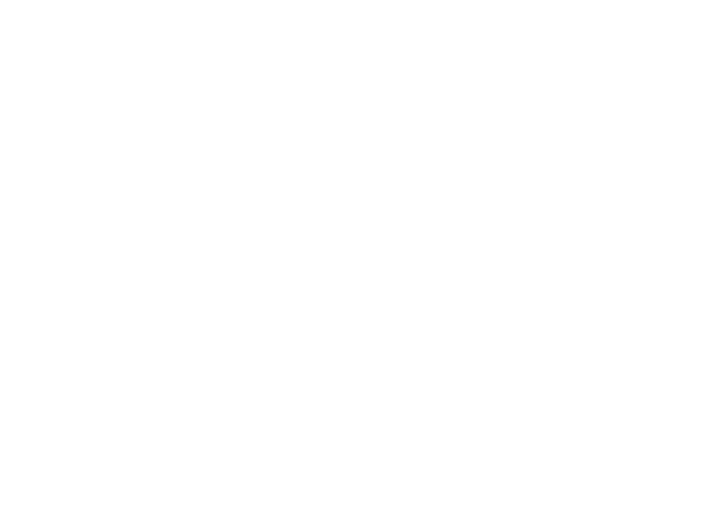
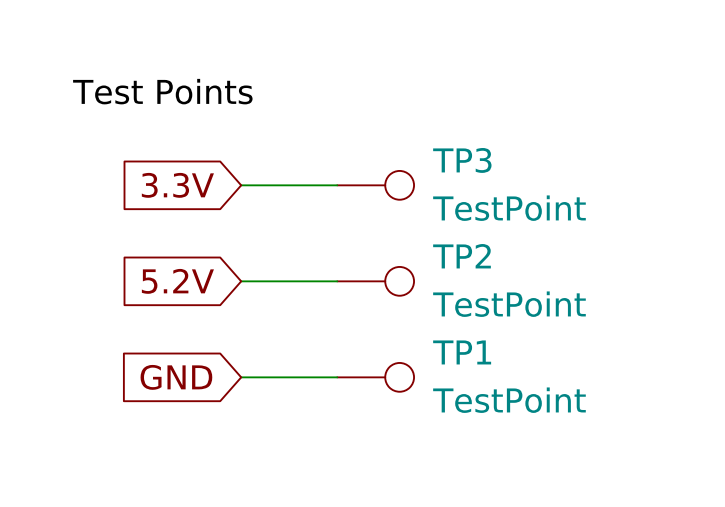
label: none -> Test Points (162, 91)
global label: none -> 3.3V (177, 185)
wire: none -> (241, 185) (337, 185)
TP3: none -> TestPoint (375, 185)
global label: none -> 5.2V (177, 281)
wire: none -> (241, 281) (337, 281)
TP2: none -> TestPoint (375, 281)
global label: none -> GND (176, 377)
wire: none -> (241, 377) (337, 377)
TP1: none -> TestPoint (375, 377)

